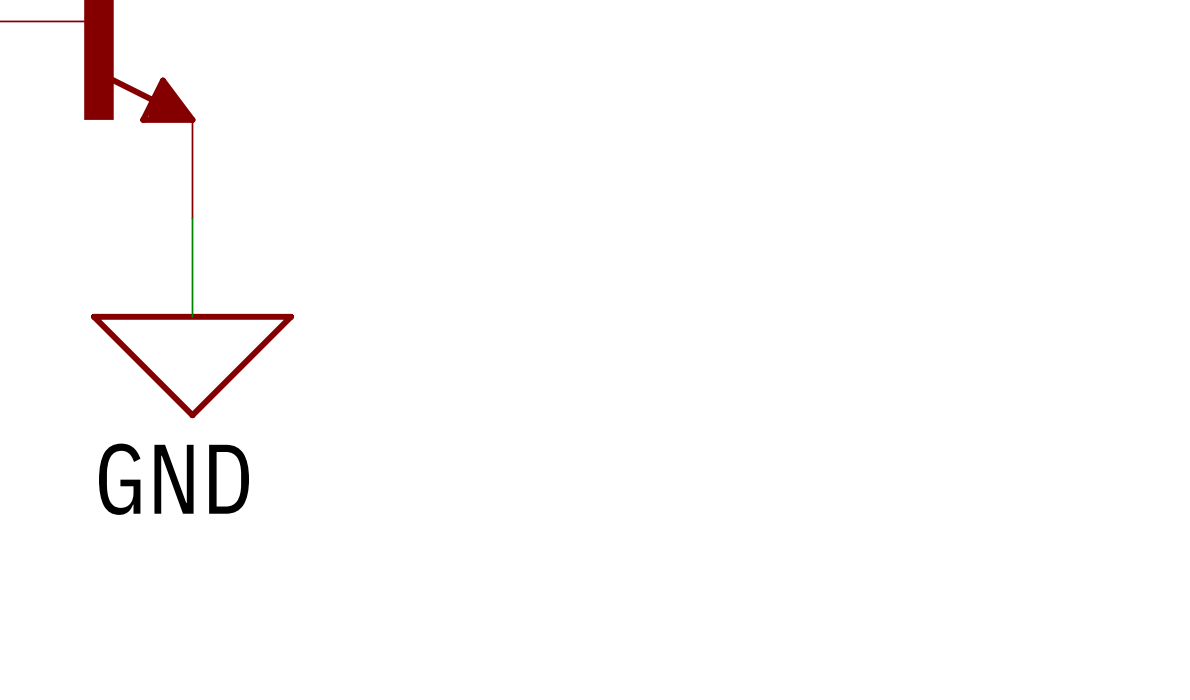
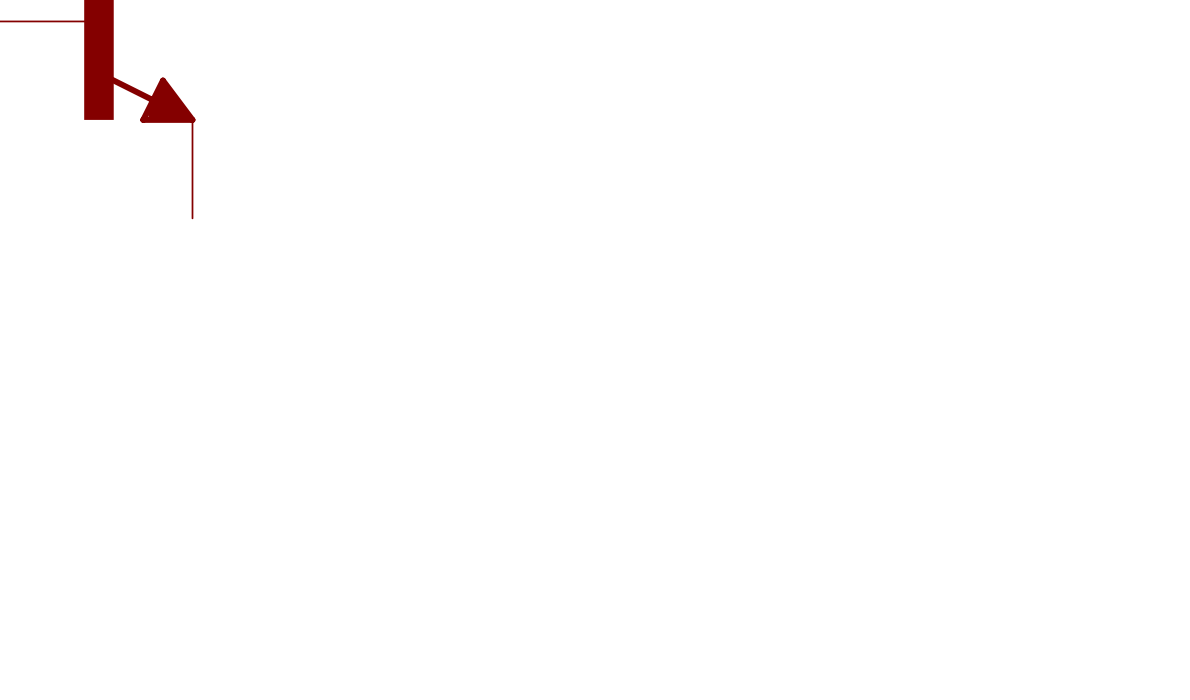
wire: (192, 218) (192, 316) -> none
power symbol: (192, 366) -> none
label: GND (174, 479) -> none

